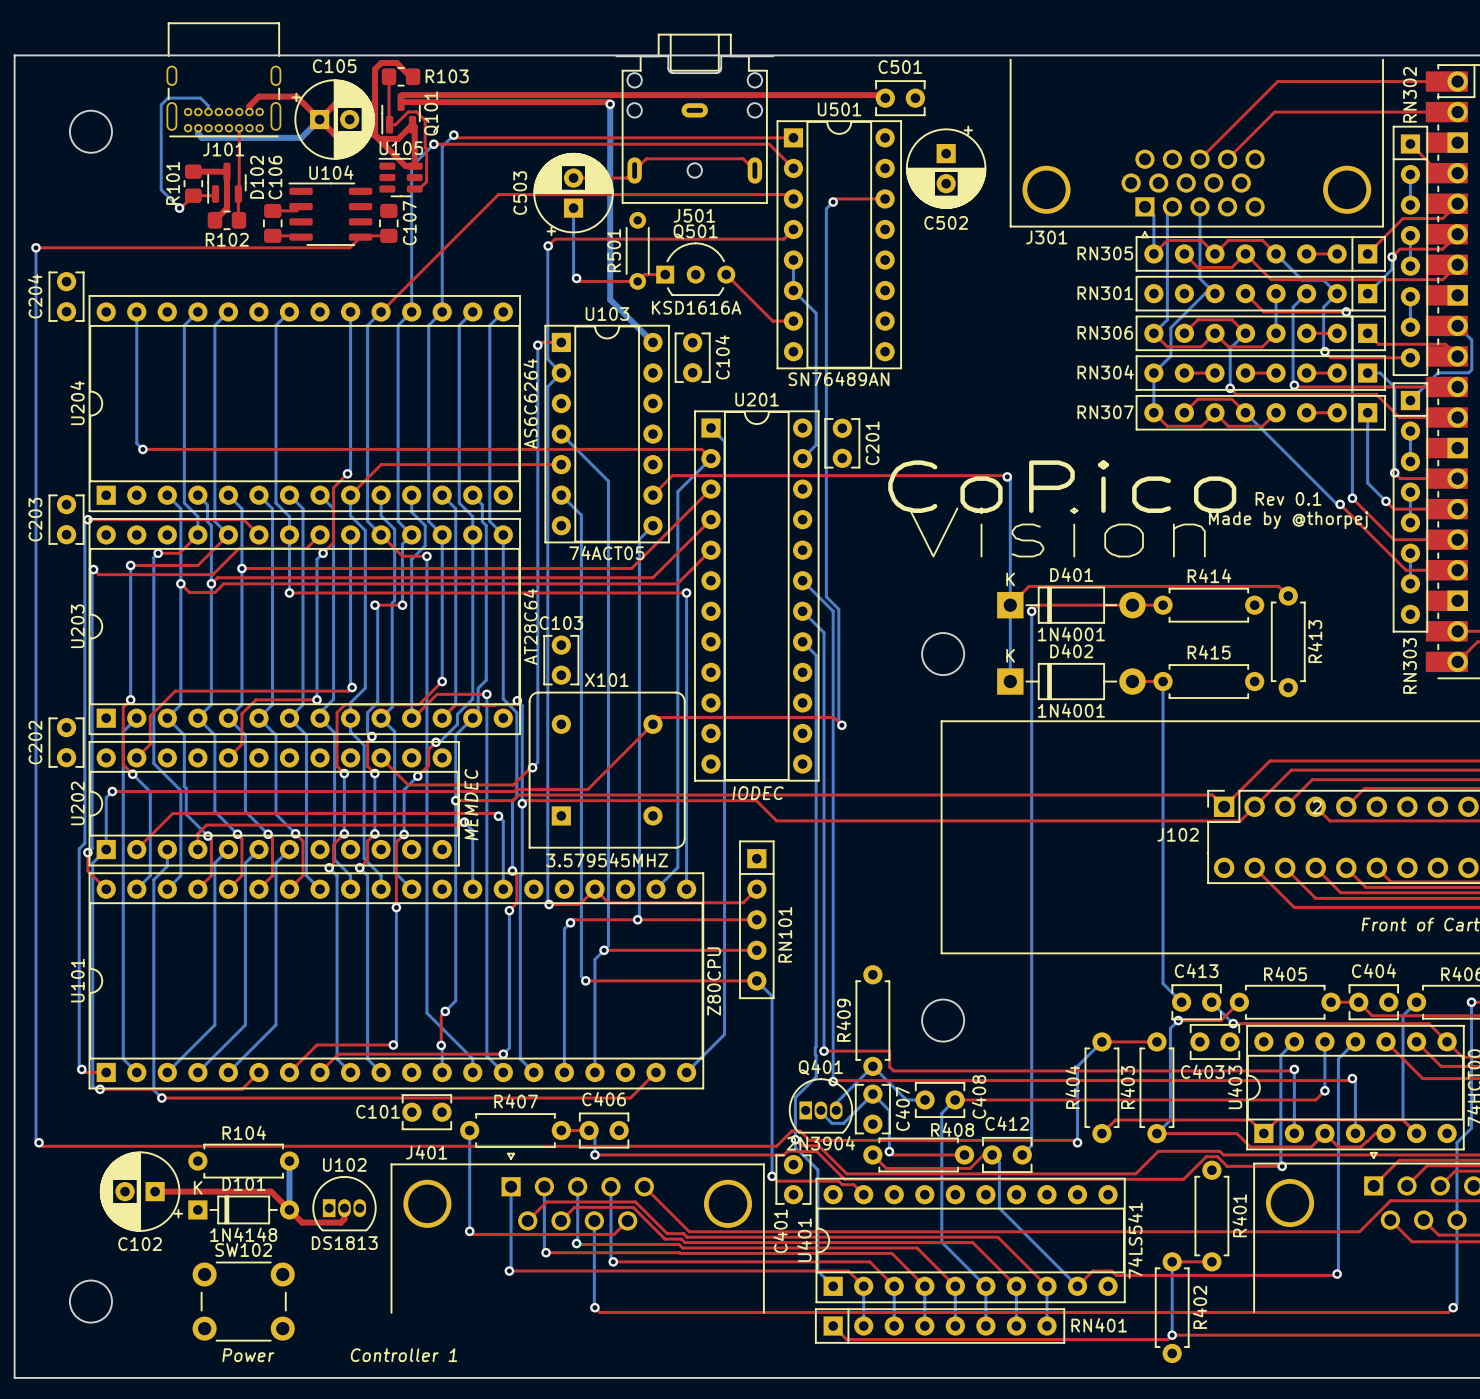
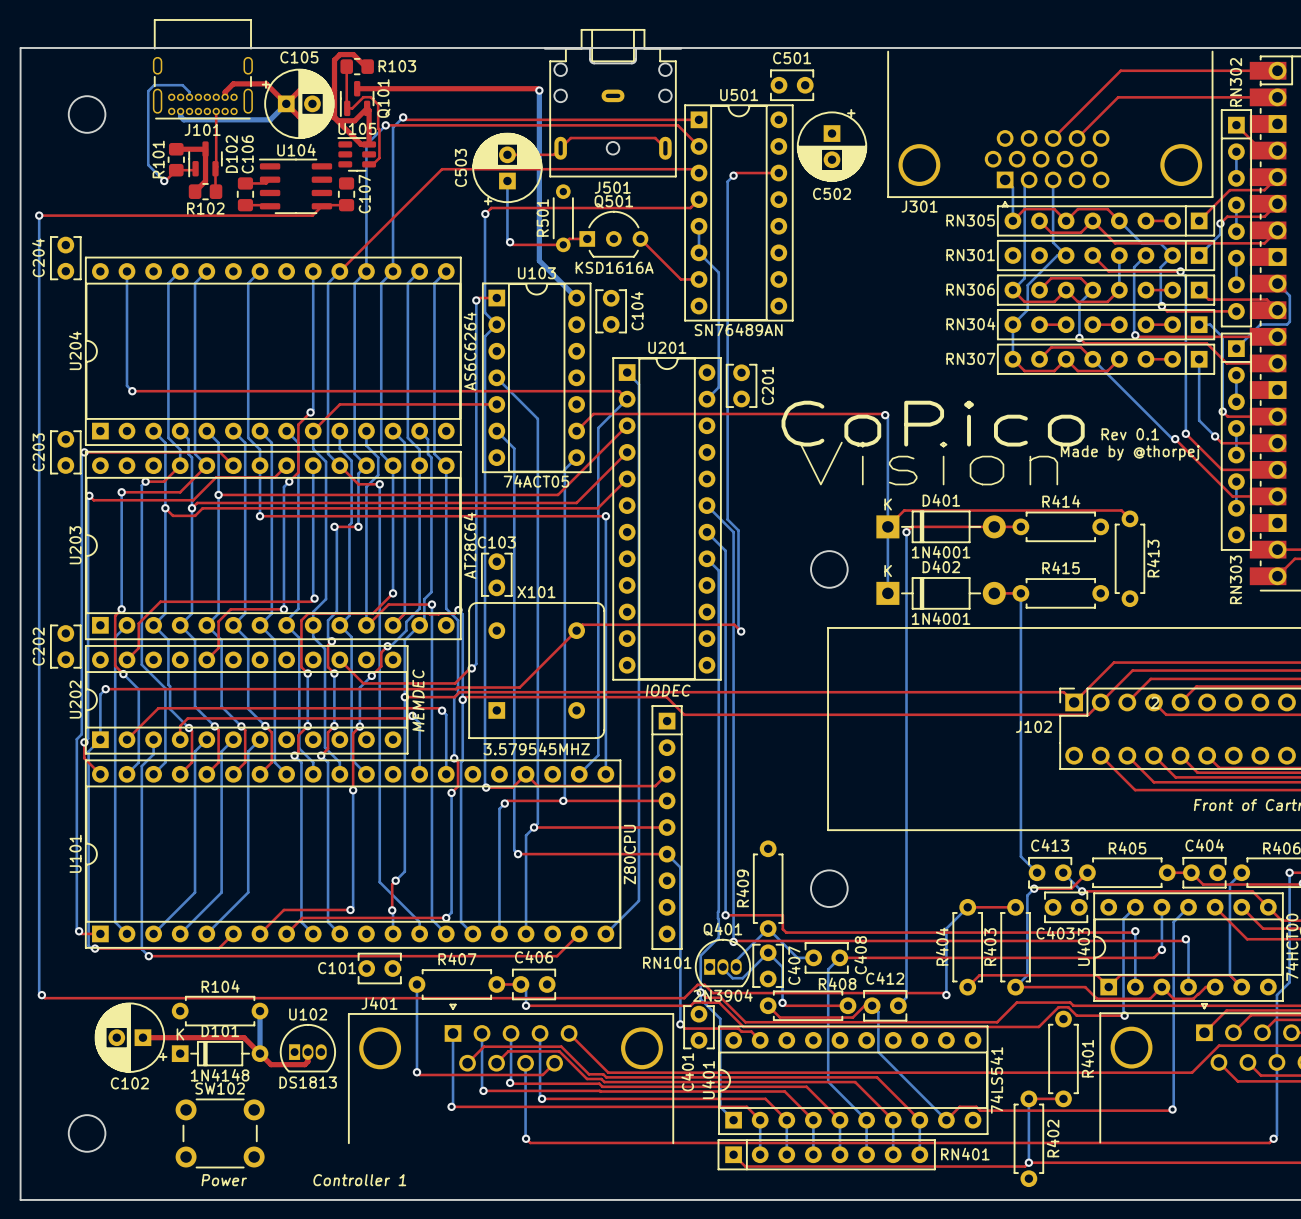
top track: (885, 98) (882, 95) (402, 95) (401, 102) -> none
RN101 footprint: [739, 840, 775, 999] -> [651, 705, 683, 950]
RN101 name position: RN101 (785, 934) -> RN101 (667, 962)

